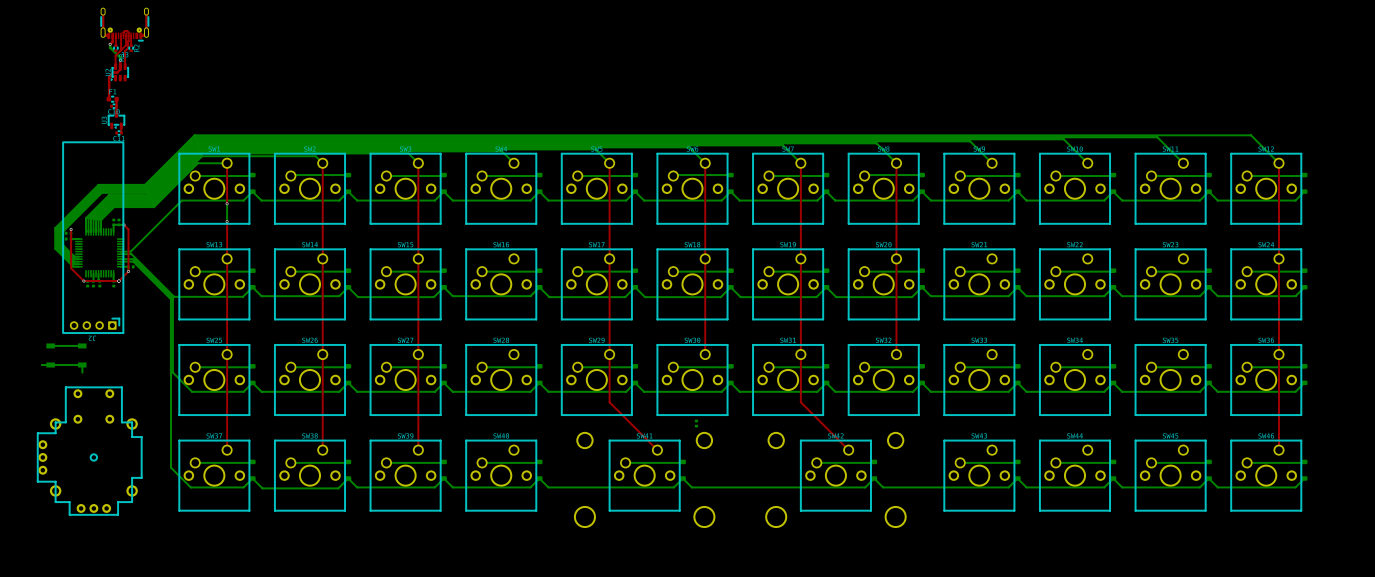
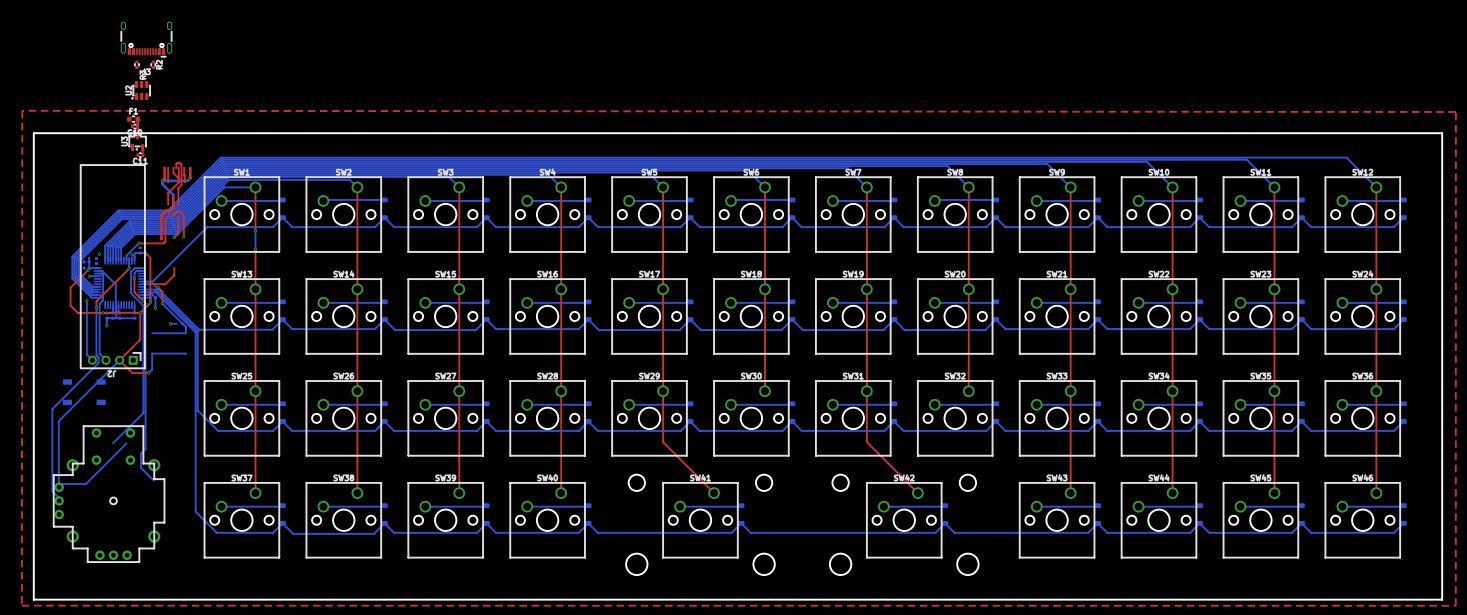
top track: (103, 11) (103, 32) (108, 35) -> none
top track: (146, 11) (146, 32) (140, 35) -> none
top track: (112, 35) (112, 41) (110, 44) -> none
top track: (116, 35) (115, 45) -> none
top track: (121, 35) (121, 50) -> none
top track: (123, 35) (124, 31) (128, 32) (127, 48) (125, 51) (125, 66) -> none
top track: (126, 35) (125, 45) (115, 55) (115, 66) -> none
top track: (131, 35) (131, 45) -> none
bottom track: (110, 44) (110, 47) (120, 57) (120, 60) -> none
via: (110, 44) -> none
top track: (120, 60) (120, 69) (109, 76) (108, 99) -> (173, 197) (173, 207) (161, 215) (160, 239)
via: (120, 60) -> none
top zone outline: none -> (22, 110) (1455, 112) (1455, 605) (21, 605) (22, 110)
board edge: none -> (33, 133) (1442, 133) (1442, 599) (33, 599) (33, 133)
top track: none -> (164, 167) (164, 178) (162, 180)
top track: none -> (168, 167) (168, 182)
top track: none -> (173, 167) (173, 173) (178, 178)
top track: none -> (176, 167) (177, 162) (181, 164) (181, 184) (178, 187) (178, 204)
top track: none -> (178, 167) (178, 182) (168, 192) (168, 204)
top track: none -> (184, 167) (184, 182)
top track: none -> (190, 167) (189, 179)
bottom track: none -> (189, 179) (162, 180) (162, 184) (173, 195) (173, 197)
via: none -> (189, 179)
via: none -> (162, 180)
top track: none -> (561, 187) (561, 493)
top track: none -> (1070, 187) (1070, 493)
top track: none -> (1172, 187) (1172, 493)
top track: none -> (1274, 187) (1274, 493)
top track: none -> (168, 216) (165, 219) (165, 241) (163, 243) (139, 243)
top track: none -> (173, 216) (176, 211) (180, 211) (183, 215) (183, 237)
top track: none -> (178, 216) (178, 233) (174, 237)
via: none -> (183, 237)
via: none -> (174, 237)
bottom track: none -> (139, 243) (126, 255) (126, 260)
via: none -> (139, 243)
part position: (113, 222) -> (96, 260)
via: none -> (99, 254)
via: none -> (131, 254)
top track: (71, 229) (71, 268) (83, 281) -> (88, 270) (70, 287) (70, 305) (77, 312) (102, 312)
via: (71, 229) -> none
bottom track: none -> (129, 260) (129, 268)
top track: none -> (174, 267) (174, 275) (165, 284) (150, 284)
top track: none -> (129, 268) (96, 301) (96, 307)
via: none -> (129, 268)
bottom track: none -> (142, 268) (134, 268) (131, 272) (131, 293) (143, 305) (143, 412) (113, 443)
via: none -> (88, 270)
bottom track: none -> (97, 270) (102, 270) (115, 284) (115, 318)
bottom track: none -> (142, 270) (136, 270) (134, 278)
bottom track: none -> (97, 273) (103, 274) (103, 300) (99, 303) (99, 353) (106, 360)
bottom track: none -> (89, 276) (97, 276)
via: none -> (89, 276)
top track: none -> (134, 278) (134, 292) (143, 301)
via: none -> (134, 278)
top track: none -> (158, 287) (162, 291) (162, 303)
via: none -> (158, 287)
bottom track: none -> (142, 294) (152, 294) (155, 297) (155, 308)
bottom track: none -> (86, 300) (86, 354) (92, 360)
via: none -> (86, 300)
bottom track: none -> (143, 301) (145, 303) (145, 449) (141, 453) (141, 467) (153, 480)
via: none -> (143, 301)
bottom track: none -> (162, 303) (185, 326) (185, 333) (152, 333)
via: none -> (162, 303)
bottom track: none -> (96, 307) (96, 355) (98, 362) (52, 409) (52, 491) (58, 497)
via: none -> (96, 307)
via: none -> (155, 308)
top track: none -> (140, 312) (140, 339) (119, 360) (132, 372) (148, 372)
bottom track: none -> (134, 318) (106, 318) (106, 325)
bottom track: none -> (170, 323) (176, 323)
via: none -> (170, 323)
via: none -> (106, 325)
bottom track: none -> (185, 353) (152, 353) (152, 369) (148, 372)
bottom track: none -> (119, 360) (58, 421) (58, 484) (85, 484) (126, 443)
via: none -> (148, 372)
bottom track: (50, 345) (82, 345) -> none
bottom track: (42, 365) (82, 365) (82, 372) -> none
part: (696, 423) -> none

